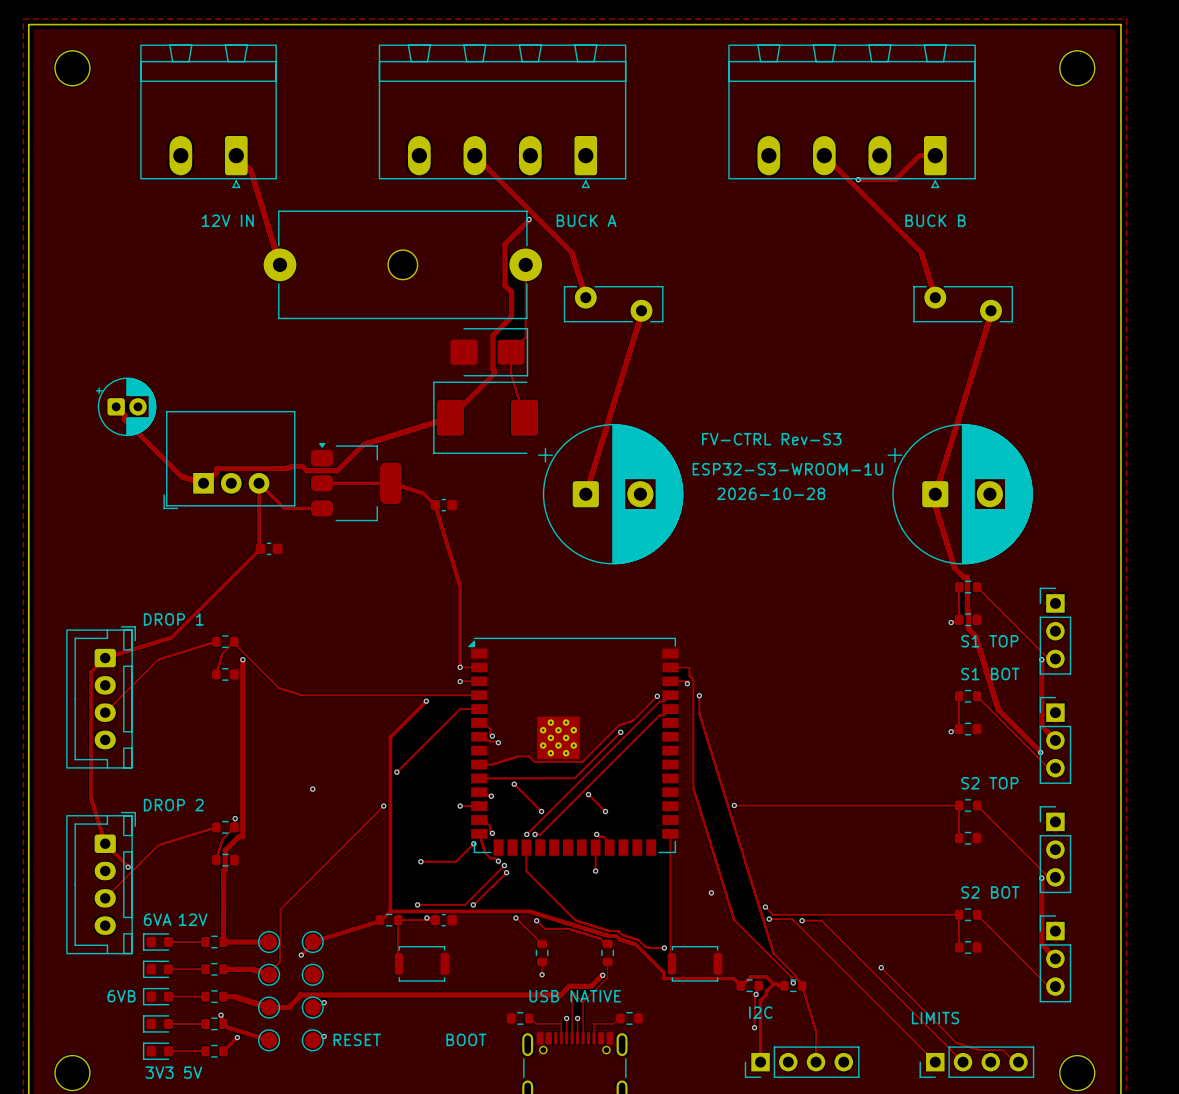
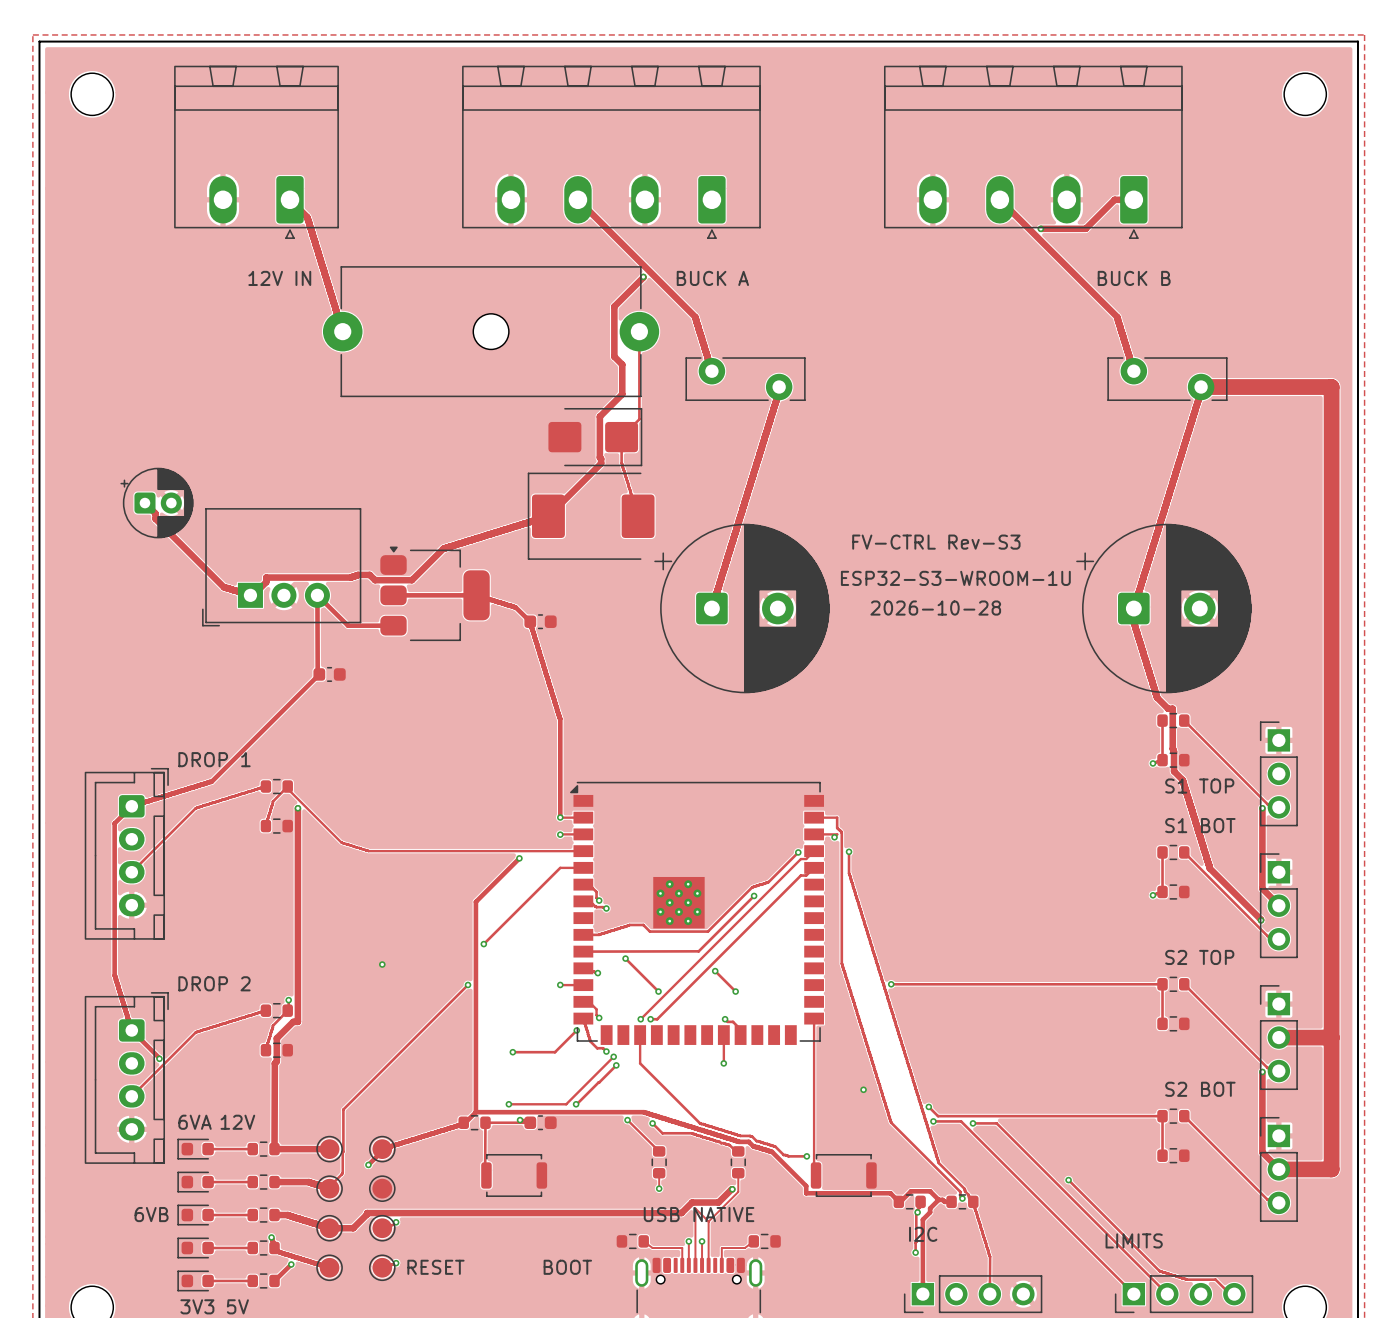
track: none -> (1201, 387) (1331, 387) (1331, 1169) (1278, 1169)
track: none -> (1278, 1037) (1331, 1037)

